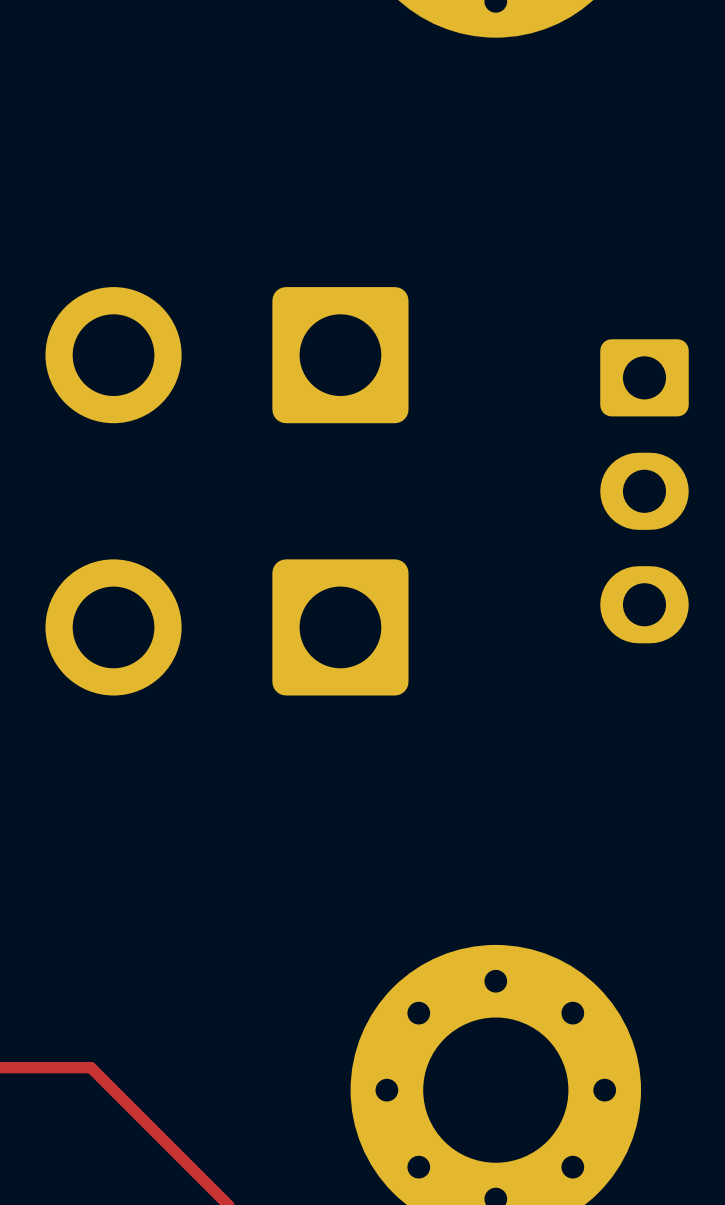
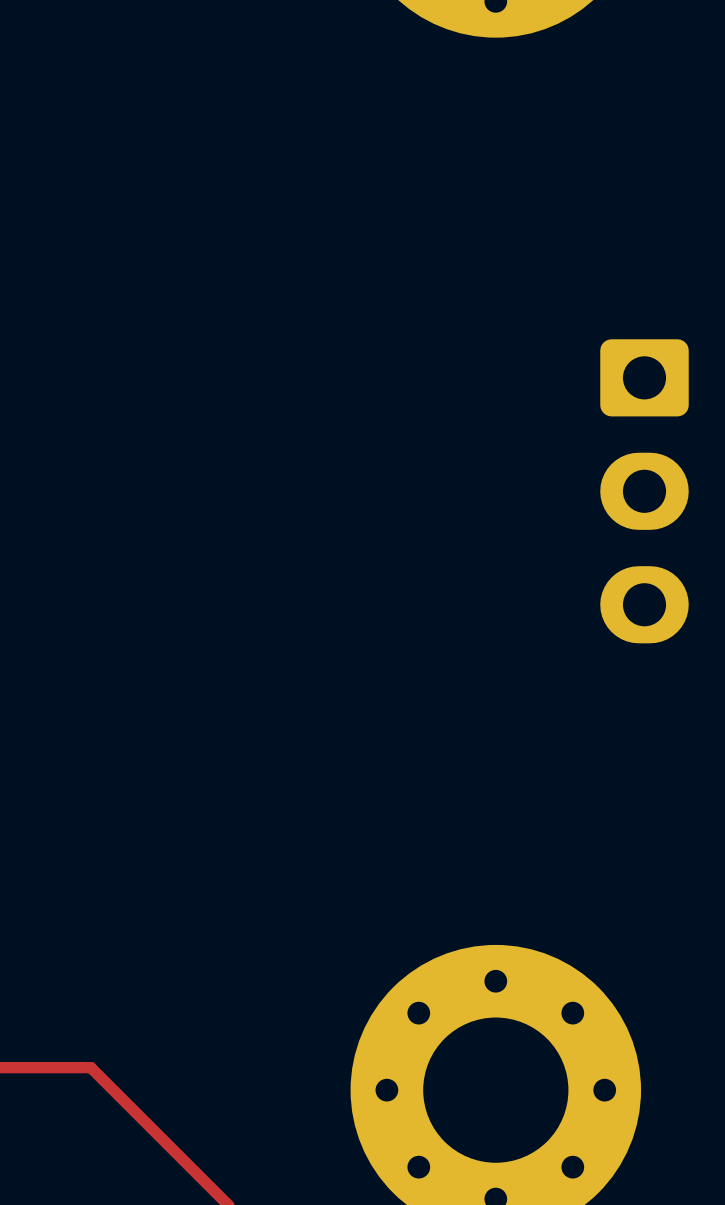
part: (226, 355) -> none
part: (226, 627) -> none

